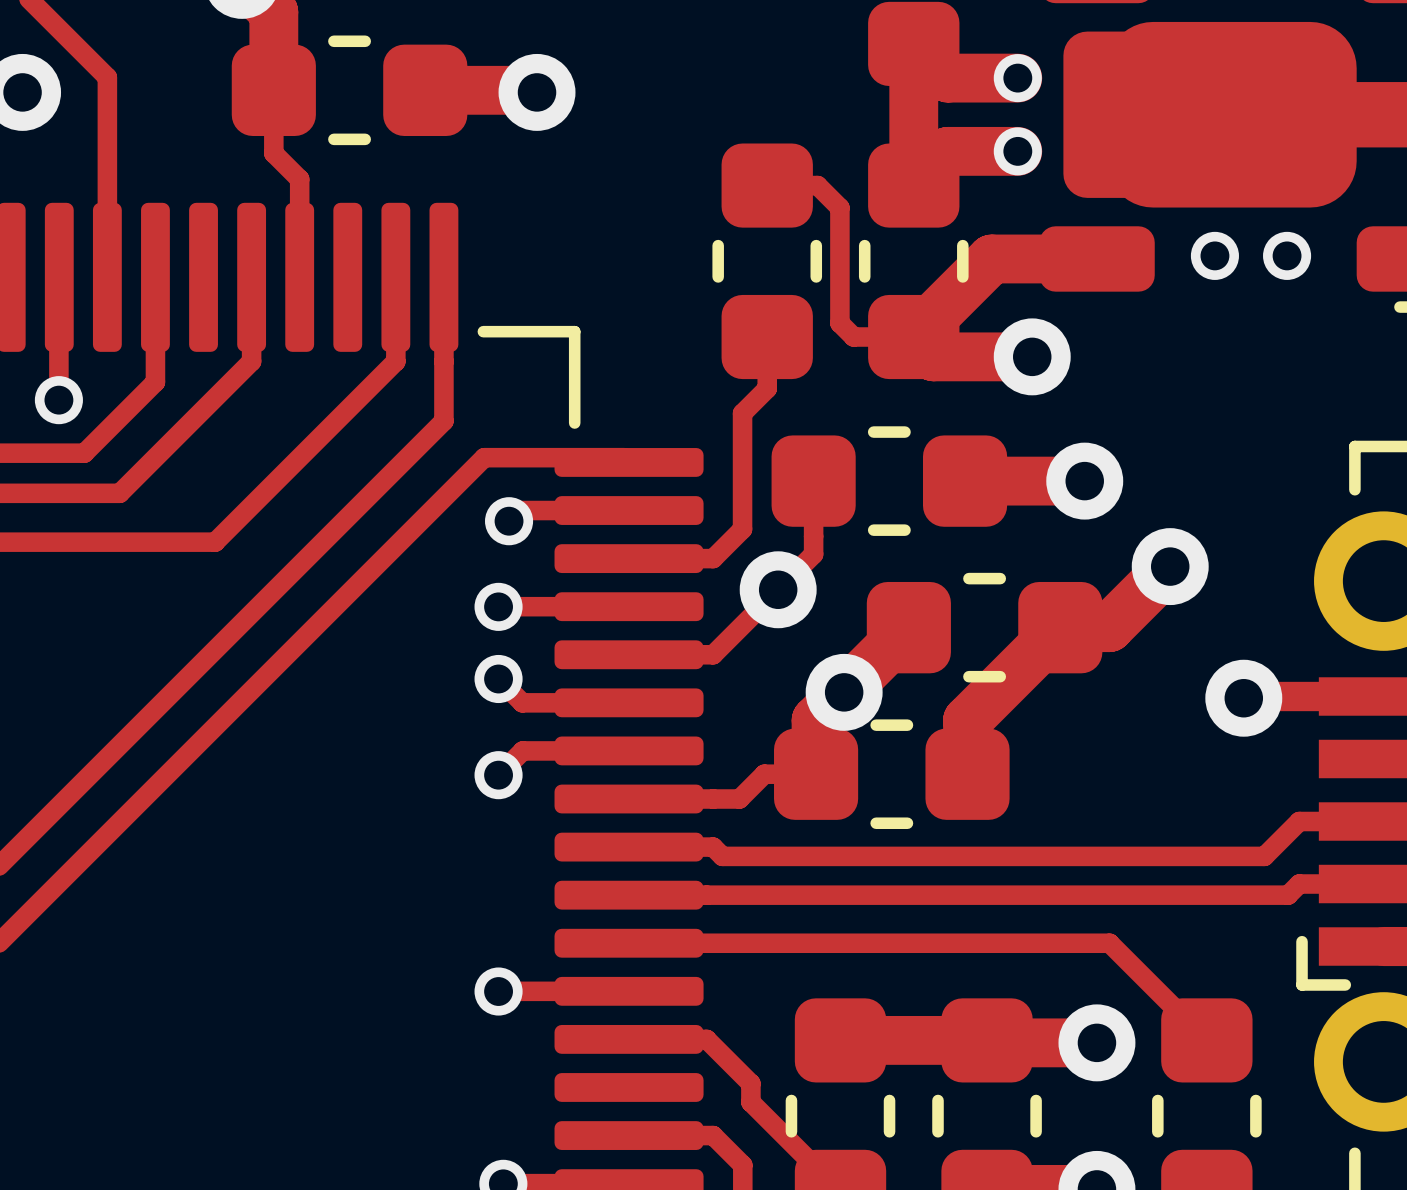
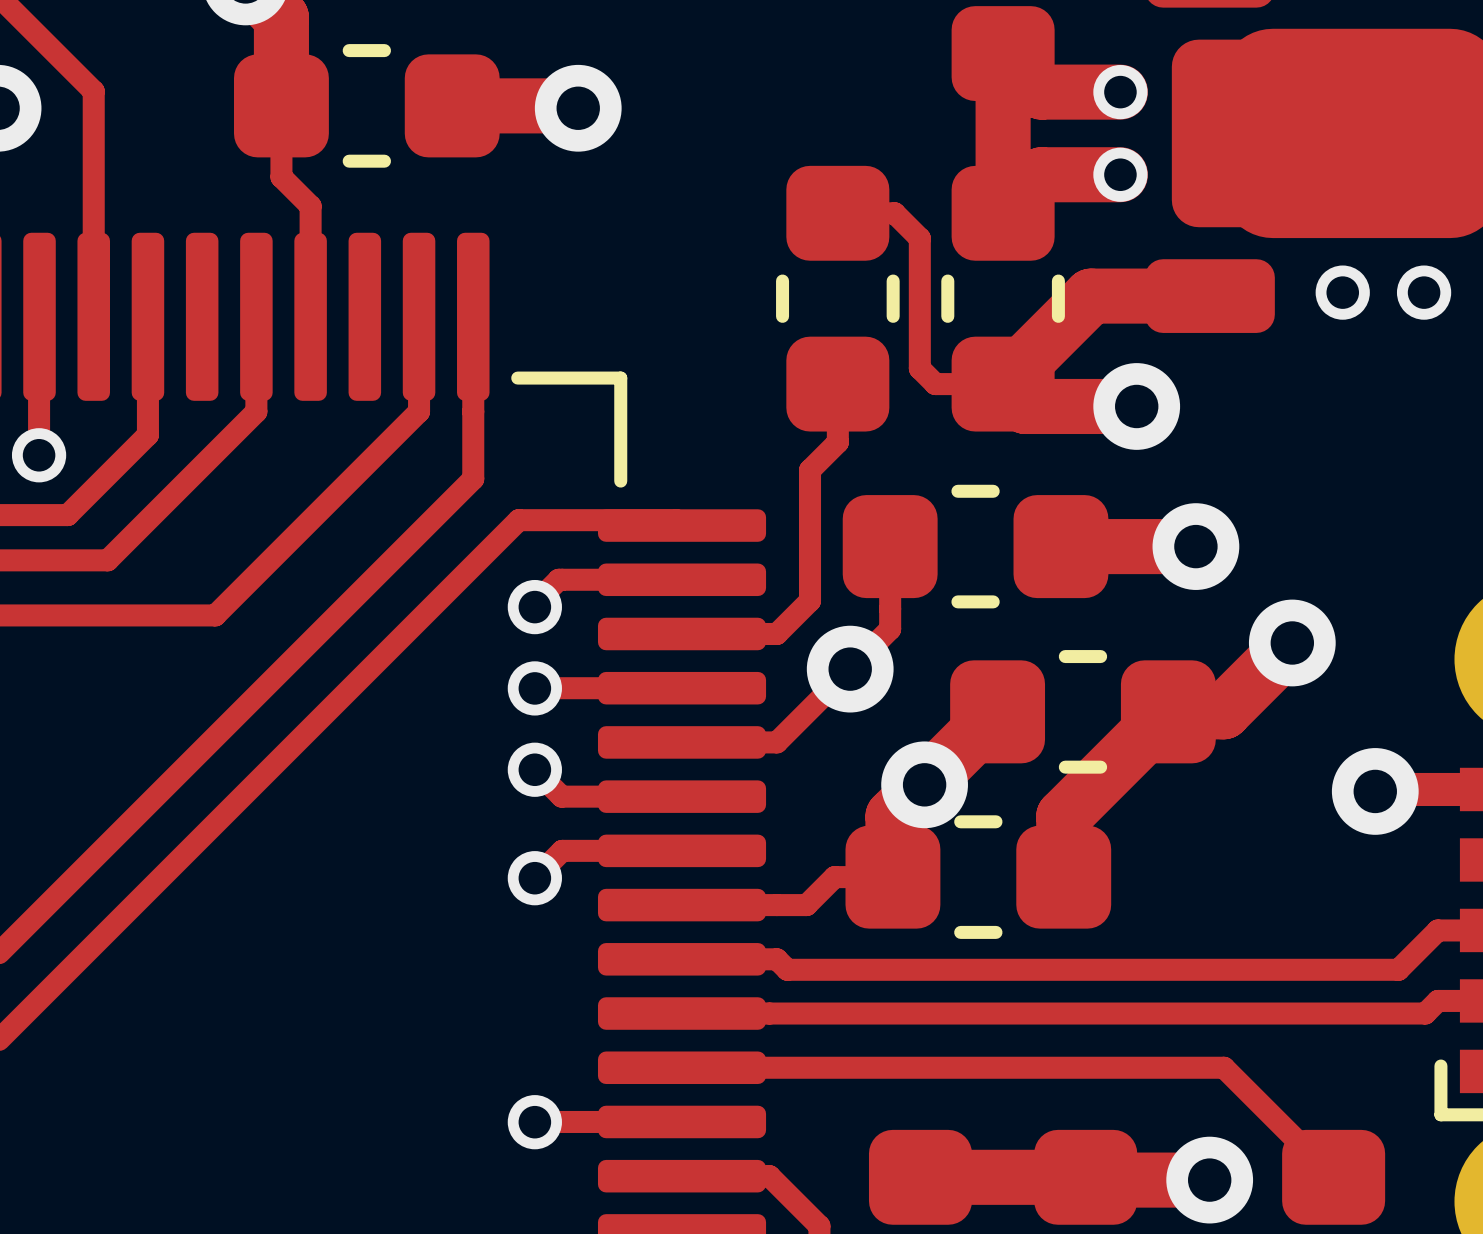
via position: (509, 521) -> (534, 607)

